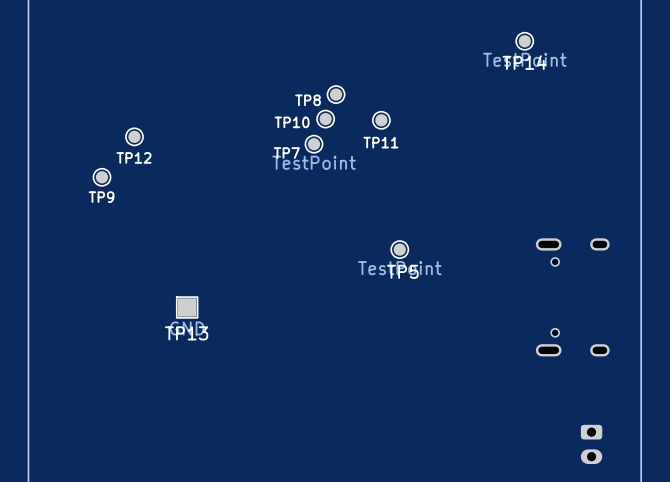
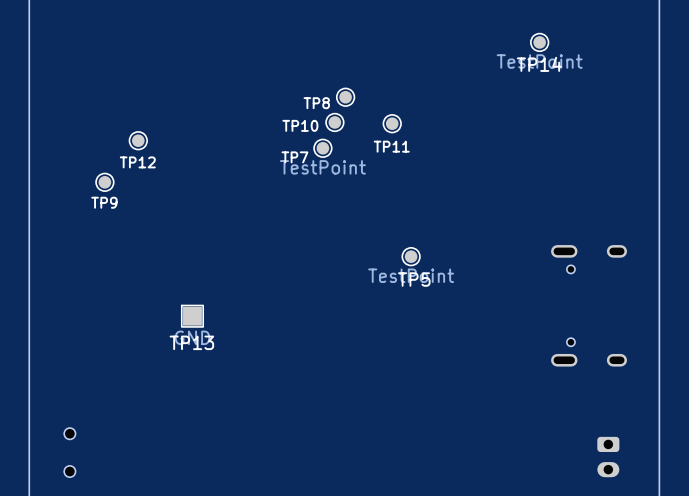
part: none -> (69, 452)

